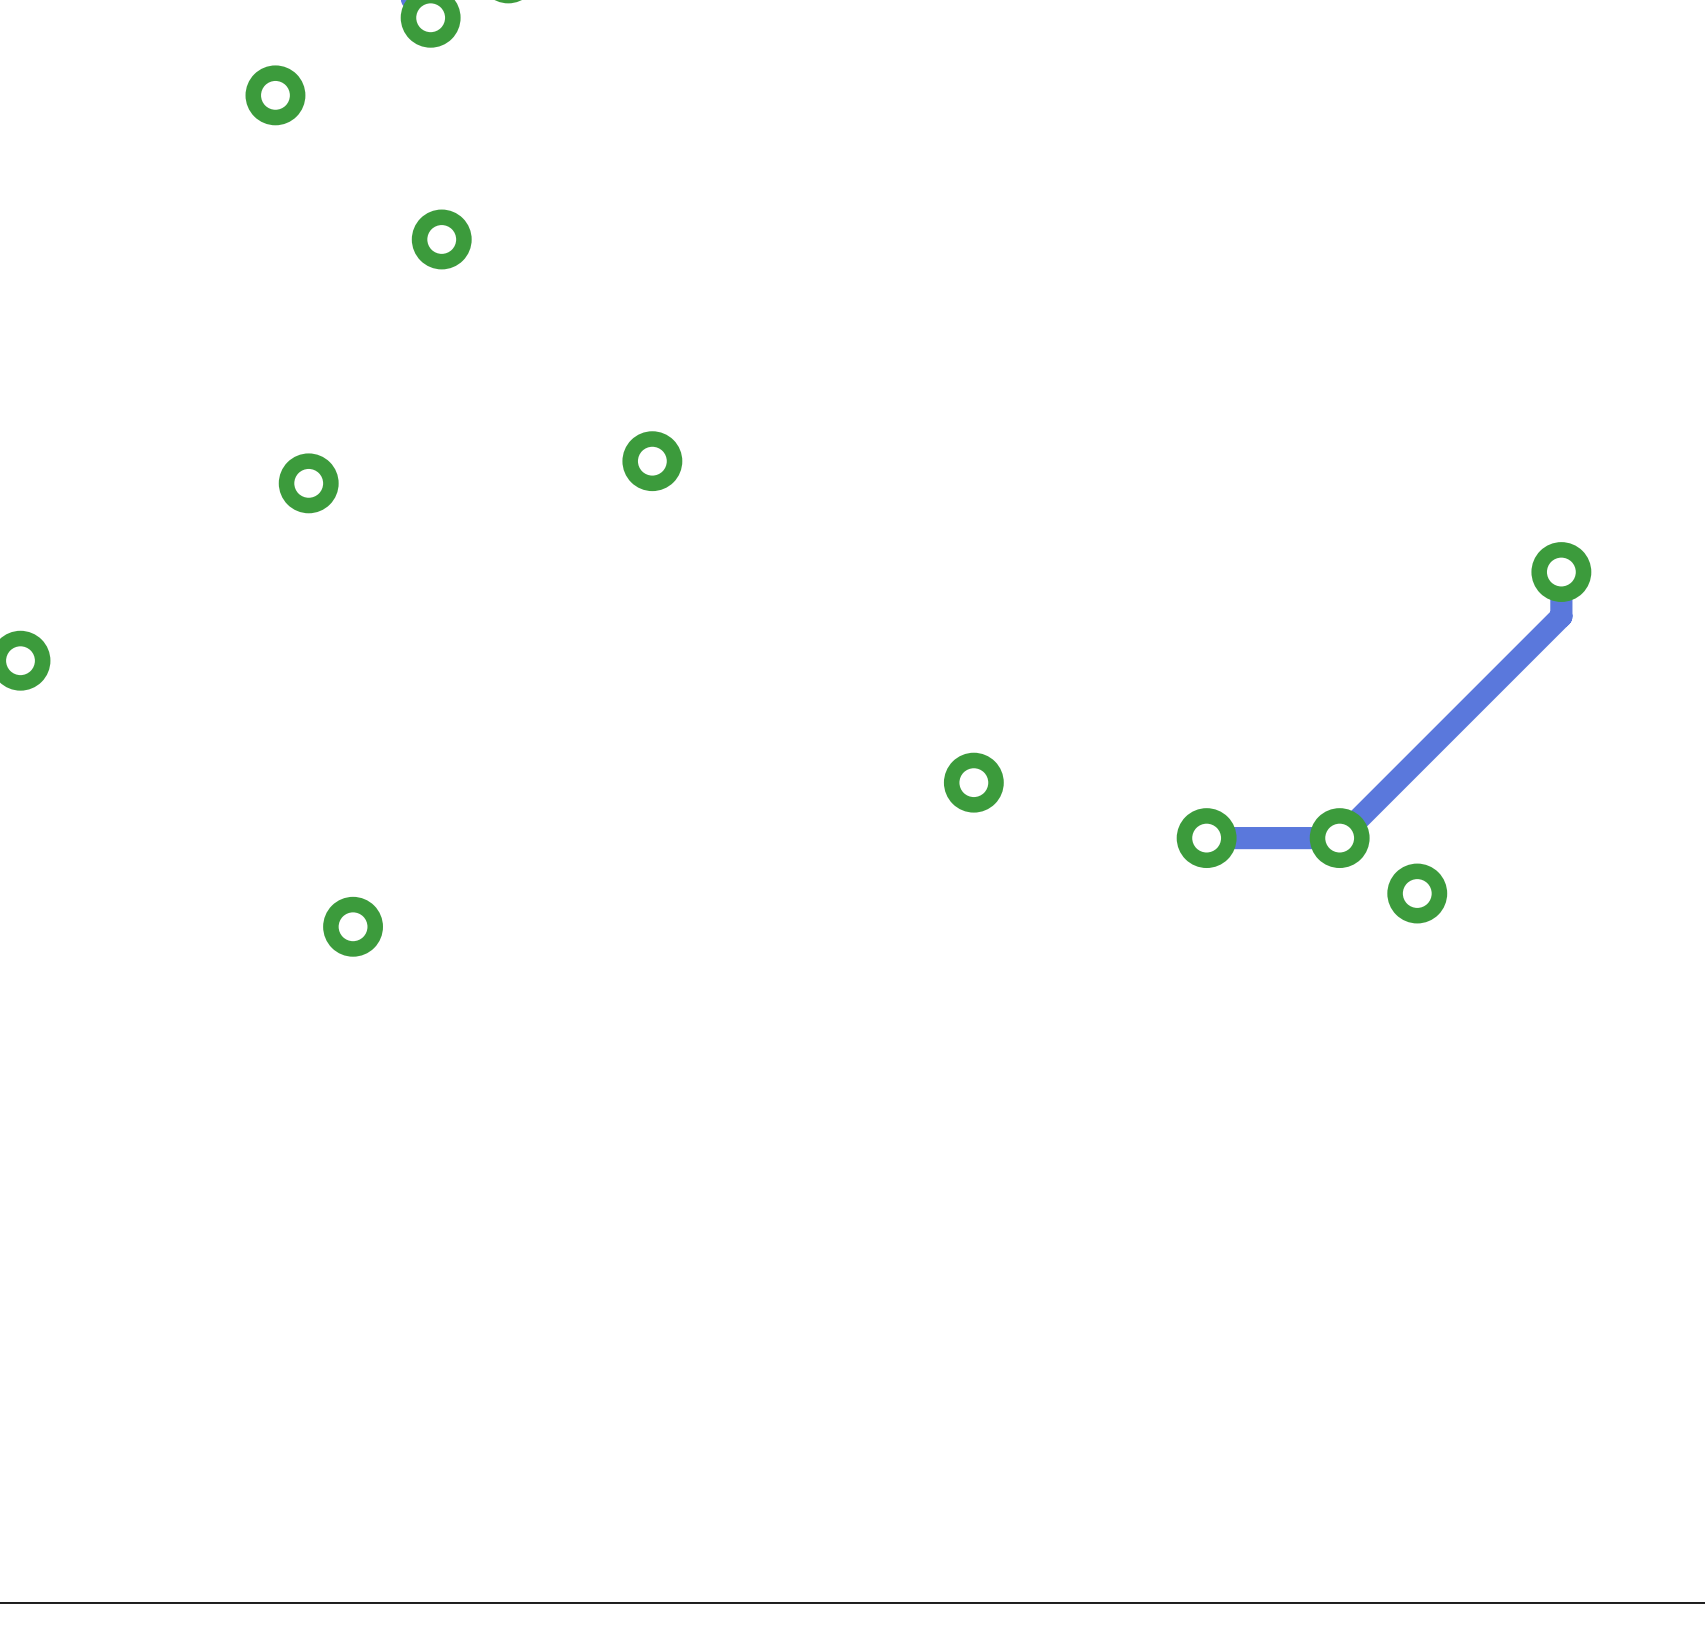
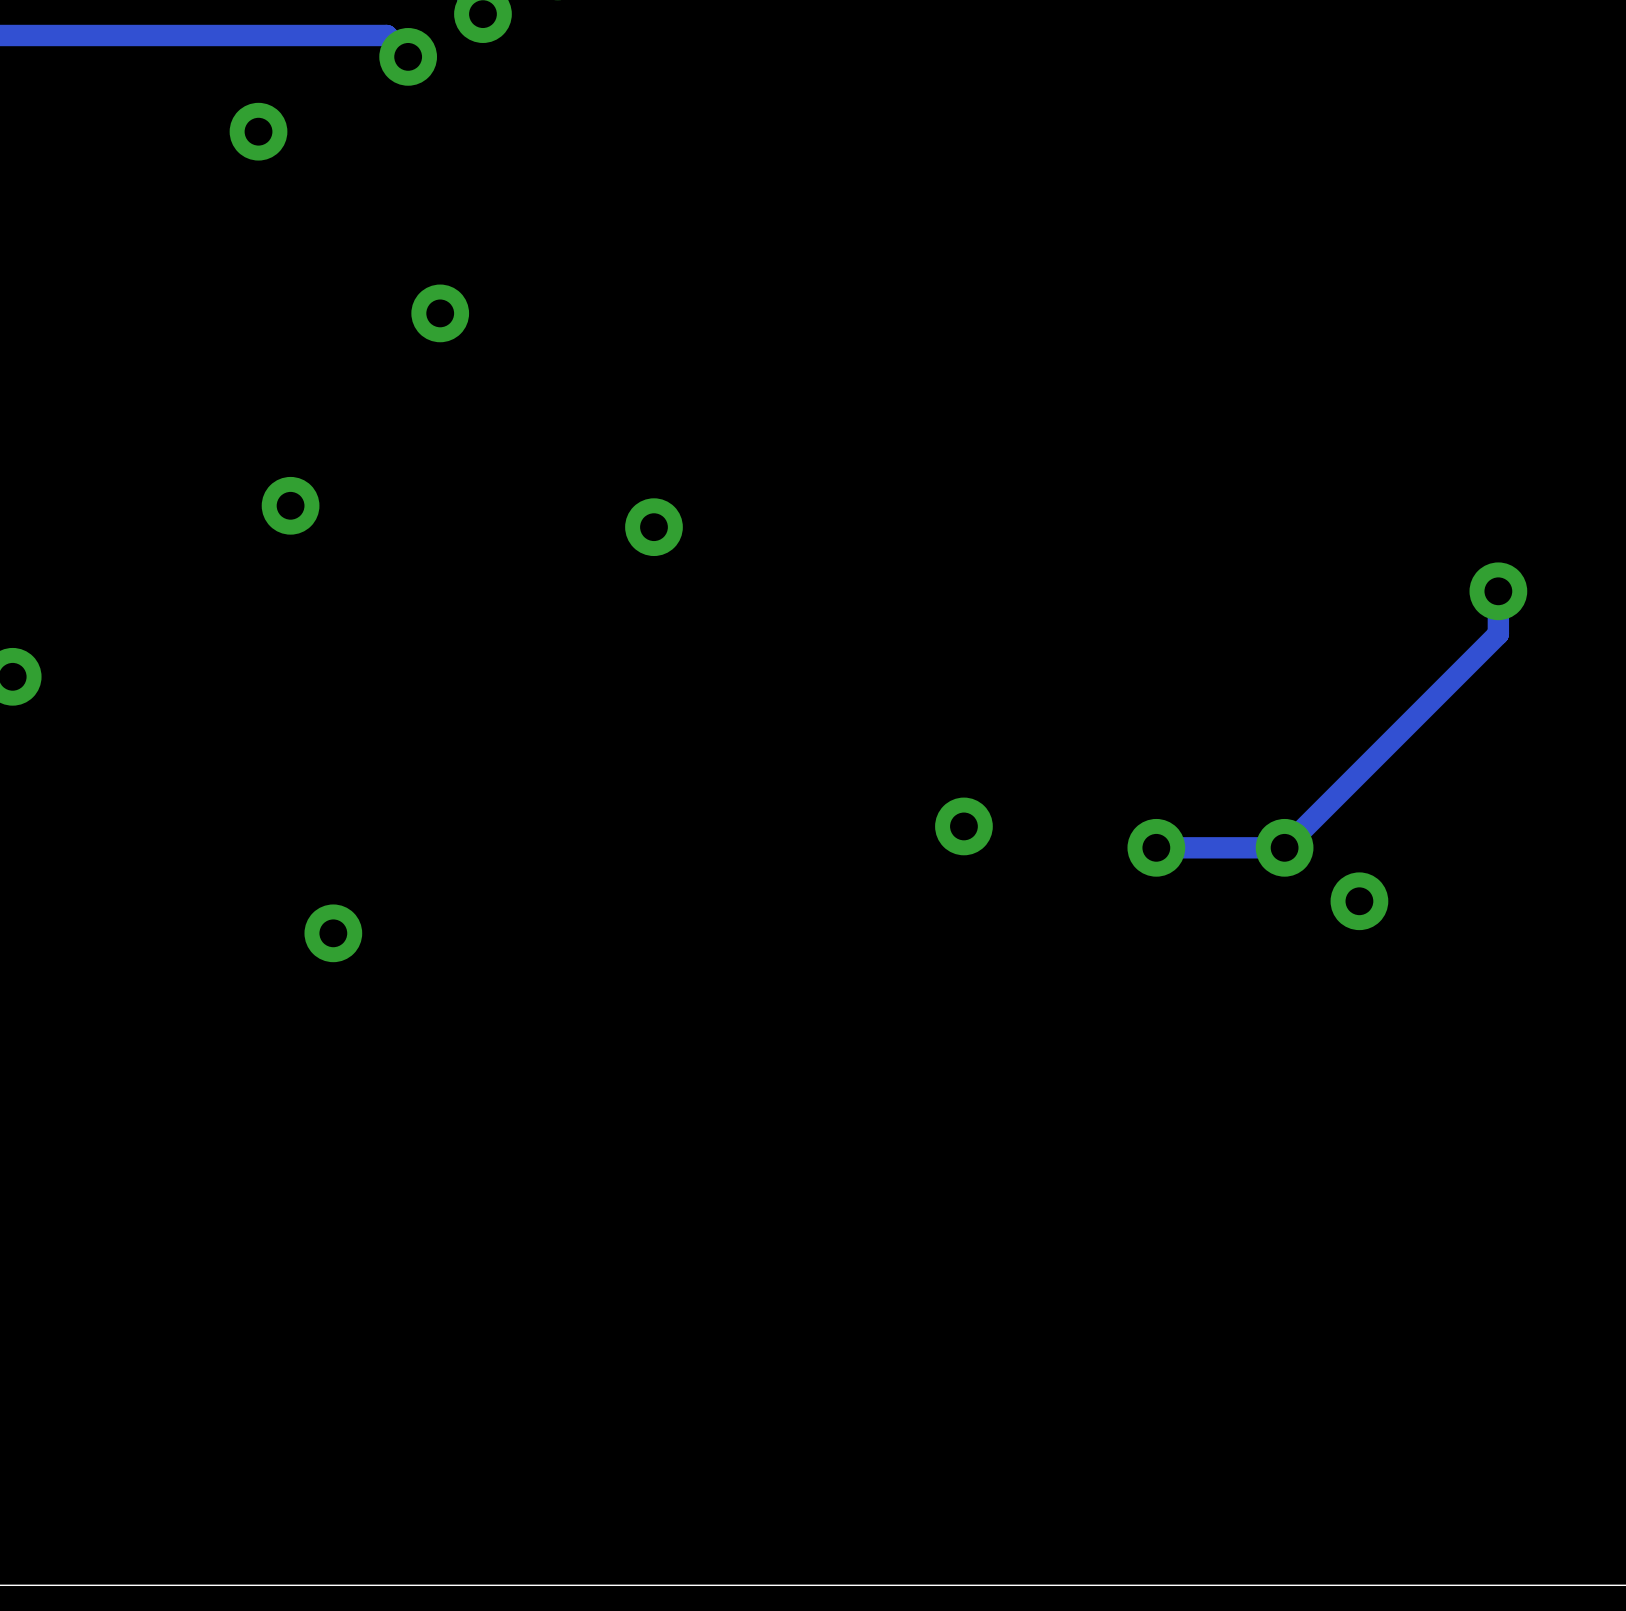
via position: (441, 239) -> (440, 313)
via position: (652, 461) -> (653, 527)
via position: (973, 782) -> (963, 826)

